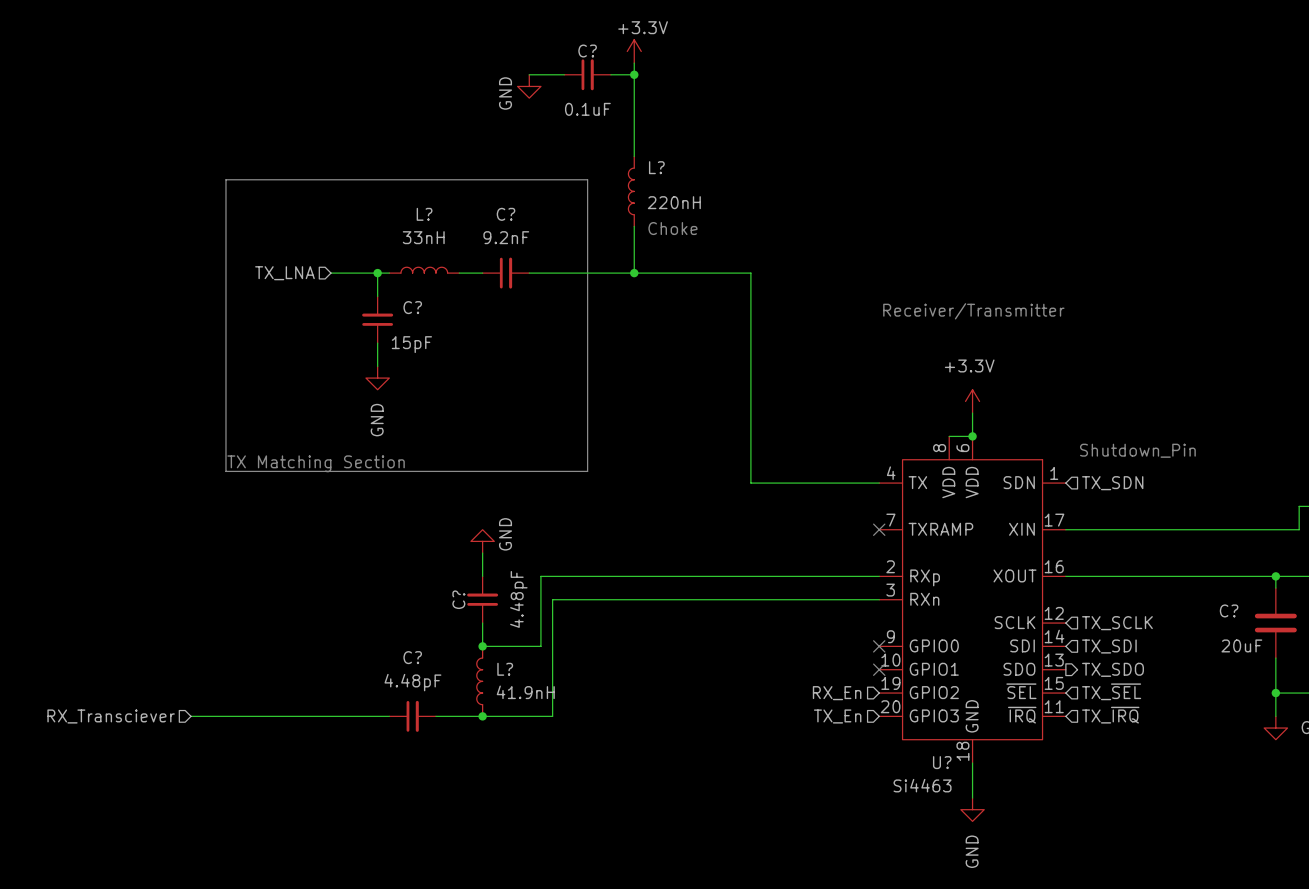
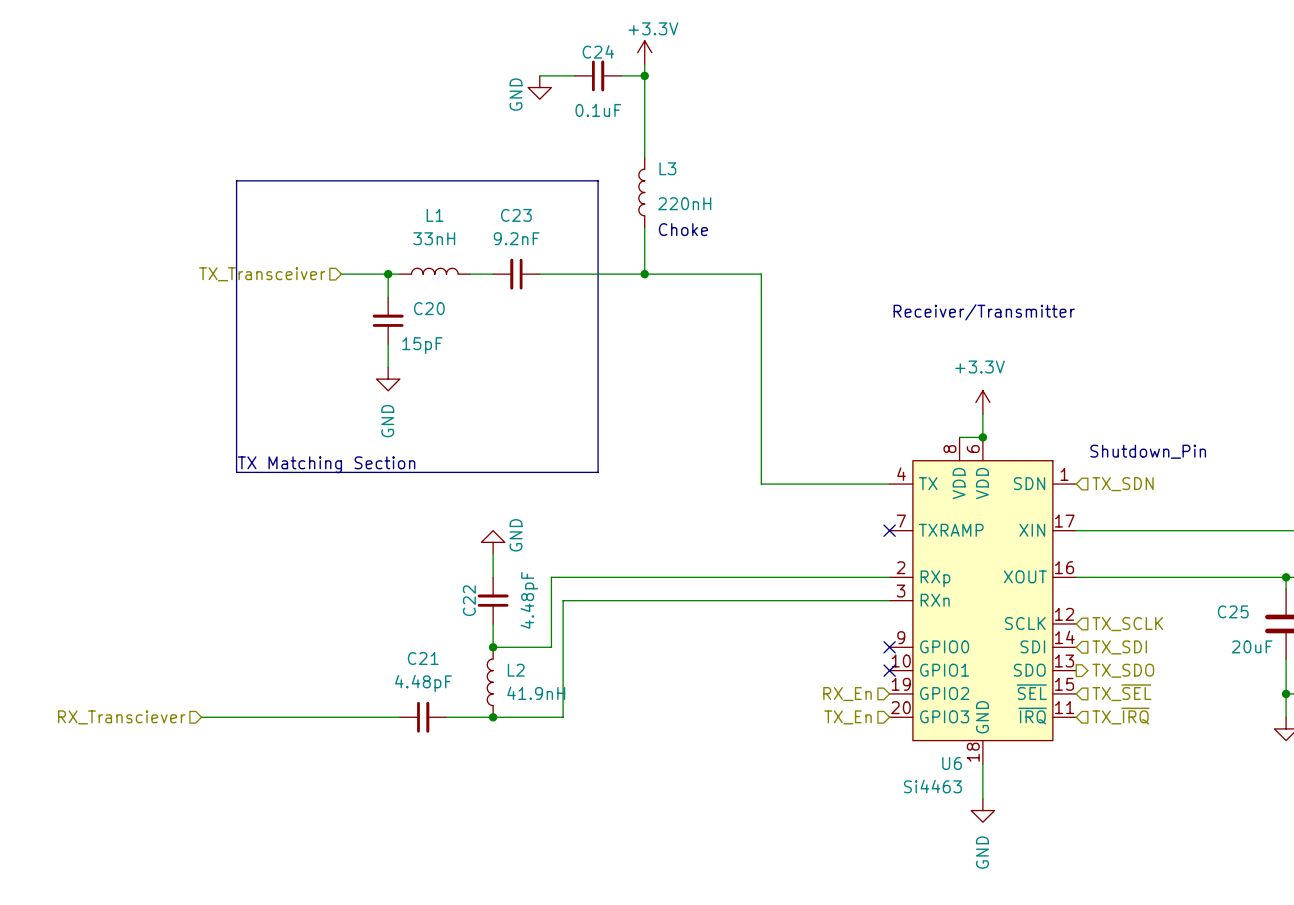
C? name: C? (587, 51) -> C24 (598, 51)
L? name: L? (656, 167) -> L3 (667, 168)
L? name: L? (424, 214) -> L1 (435, 215)
hierarchical label: TX_LNA (284, 273) -> TX_Transceiver (262, 274)
C?: 9.2nF (505, 273) -> none
C23: none -> 9.2nF (516, 274)
C? name: C? (412, 307) -> C20 (429, 308)
C? name: C? (458, 599) -> C22 (469, 600)
C? name: C? (1229, 610) -> C25 (1233, 611)
C? name: C? (412, 657) -> C21 (423, 658)
L? name: L? (505, 669) -> L2 (516, 670)
U? name: U? (942, 762) -> U6 (952, 763)

